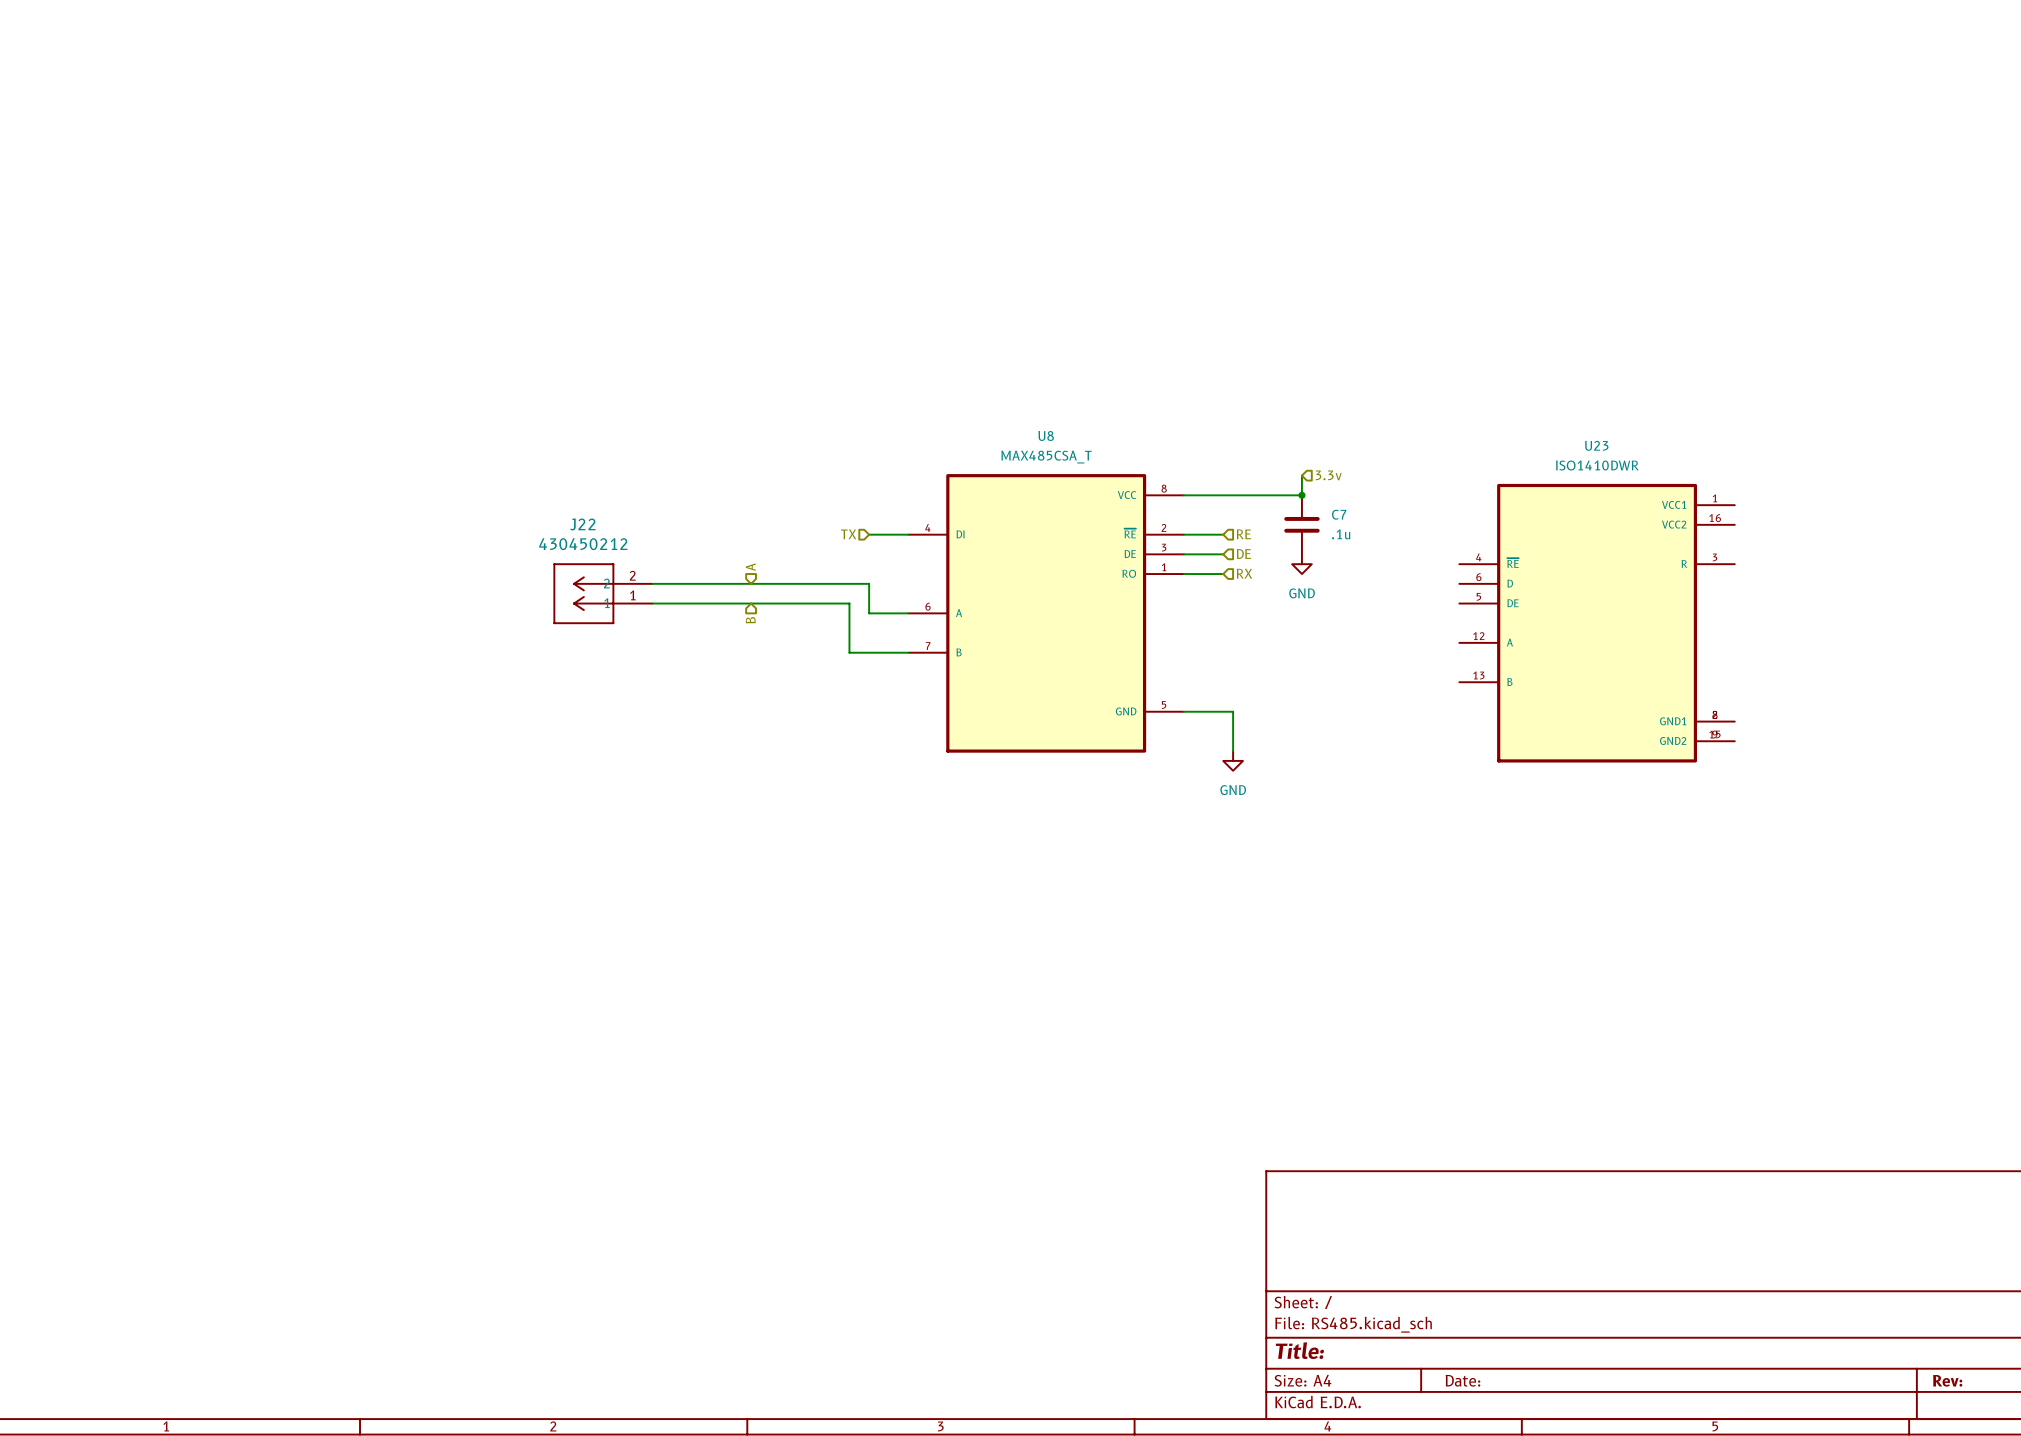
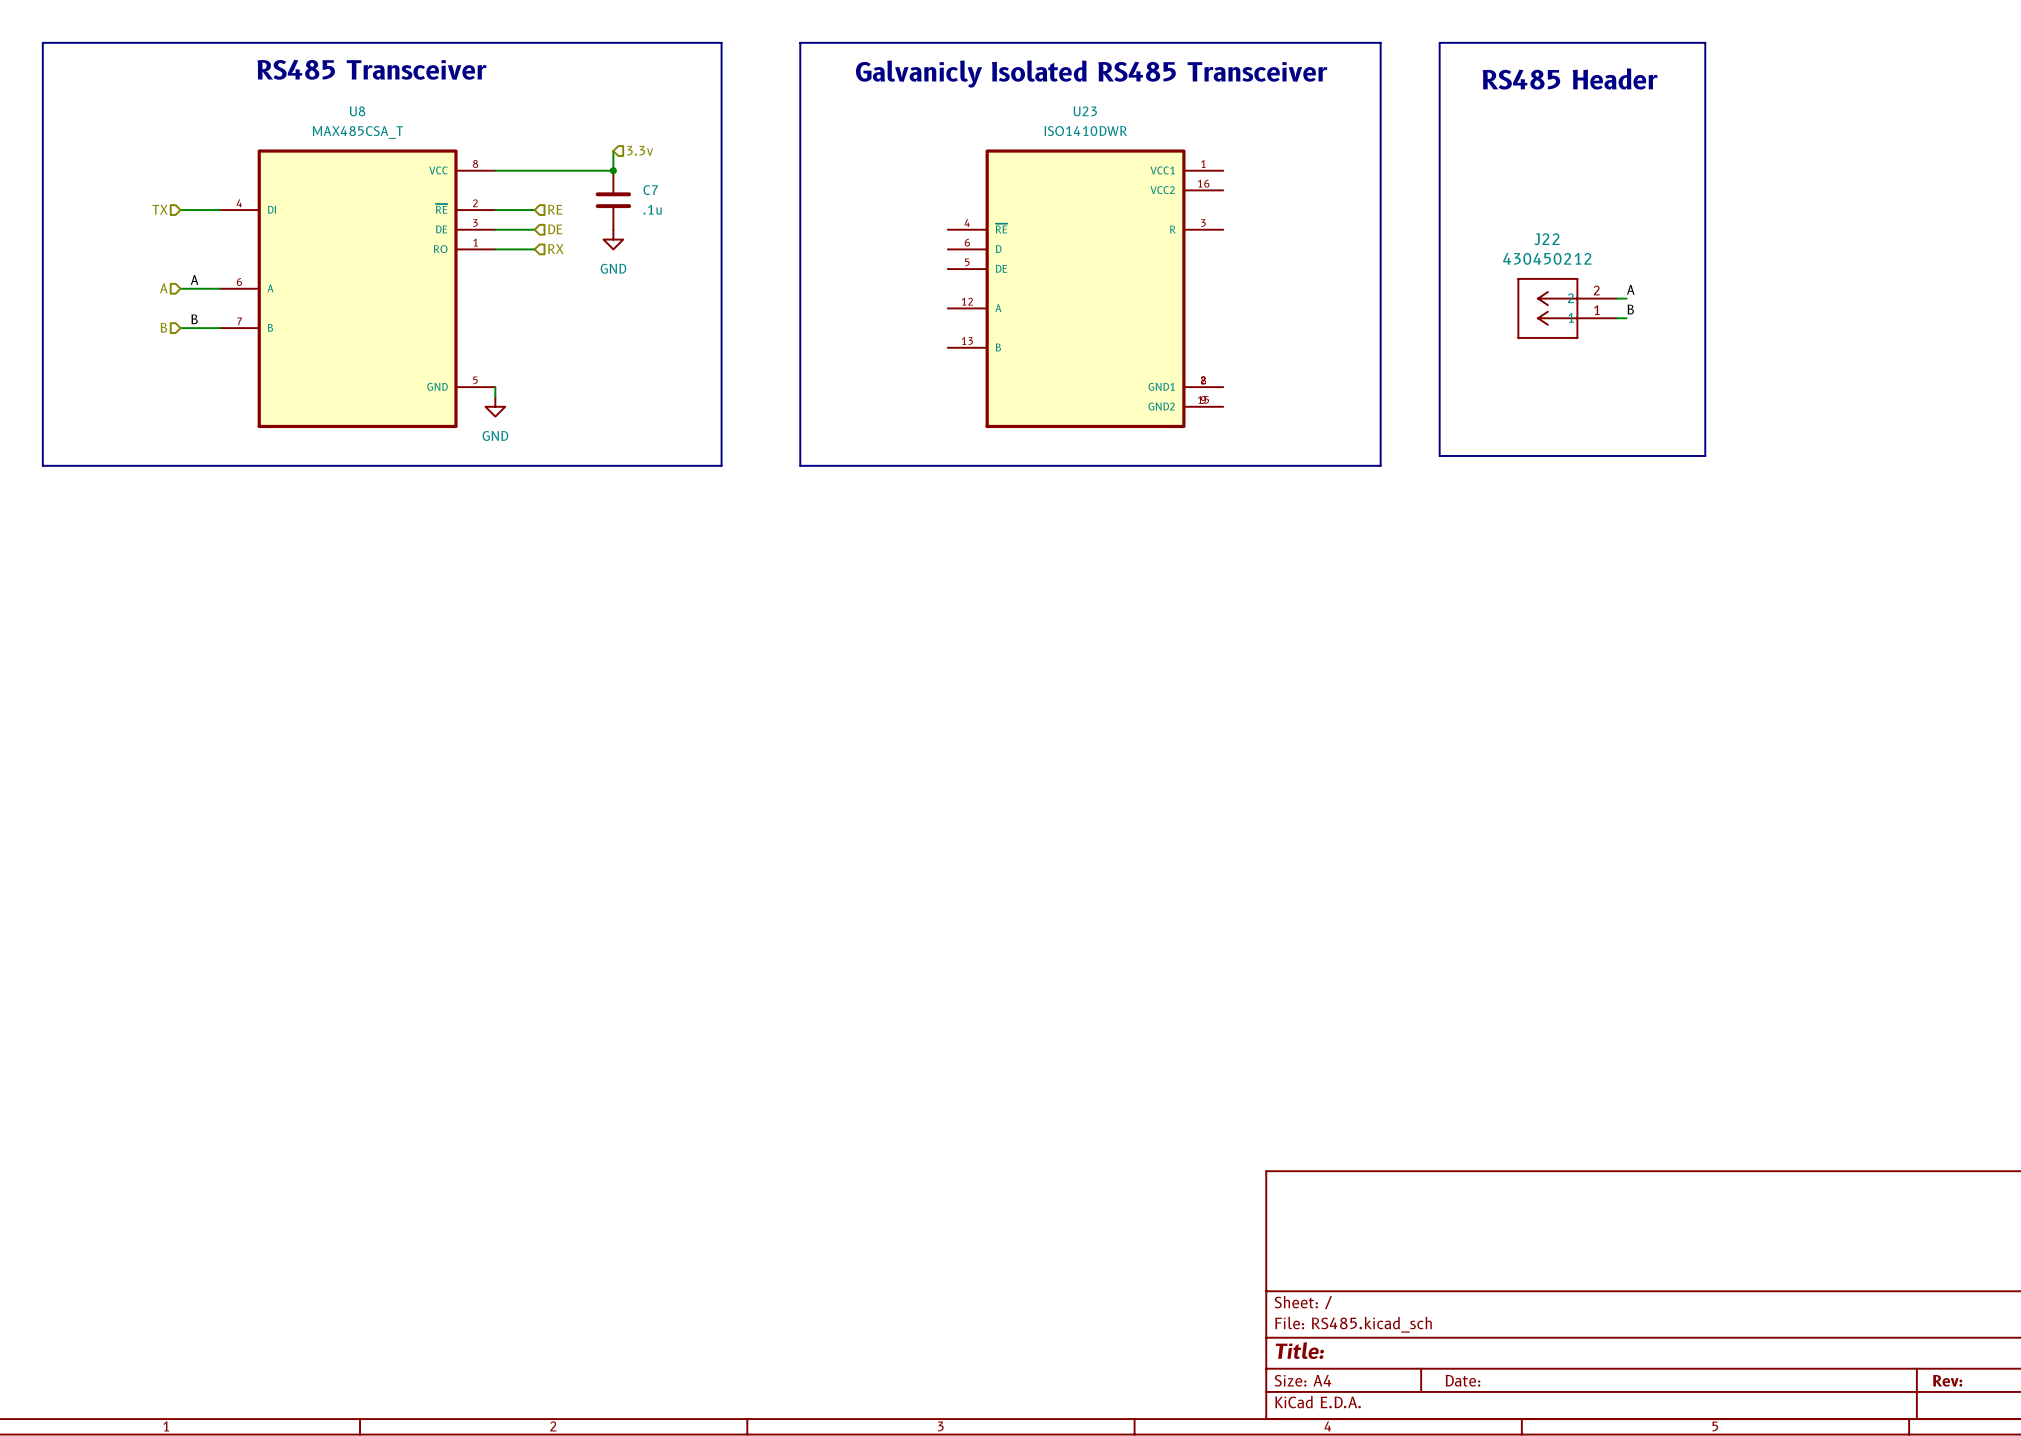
line: none -> (42, 42) (721, 42) (721, 465) (42, 465) (42, 42)
line: none -> (800, 42) (1380, 42) (1380, 465) (800, 465) (800, 42)
line: none -> (1439, 42) (1705, 42) (1705, 455) (1439, 455) (1439, 42)
text: none -> RS485 Transceiver (371, 69)
text: none -> Galvanicly Isolated RS485 Transceiver (1091, 74)
text: none -> RS485 Header (1570, 78)
hierarchical label: none -> 3.3v (640, 150)
wire: none -> (613, 151) (613, 170) (495, 170)
junction: none -> (613, 170)
hierarchical label: none -> TX (160, 209)
hierarchical label: none -> RE (555, 209)
wire: none -> (180, 210) (219, 210)
wire: none -> (495, 210) (534, 210)
wire: none -> (495, 229) (534, 229)
hierarchical label: none -> DE (555, 229)
power symbol: none -> GND (613, 239)
wire: none -> (495, 249) (534, 249)
hierarchical label: none -> RX (555, 249)
label: none -> A (194, 279)
hierarchical label: none -> A (163, 288)
wire: none -> (180, 288) (219, 288)
label: none -> A (1630, 289)
wire: none -> (1616, 298) (1626, 298)
label: none -> B (1630, 309)
wire: none -> (1616, 318) (1626, 318)
label: none -> B (194, 319)
hierarchical label: none -> B (163, 327)
wire: none -> (180, 328) (219, 328)
wire: none -> (495, 387) (495, 396)
power symbol: none -> GND (495, 406)
wire: (1301, 475) (1301, 495) (1183, 495) -> none
hierarchical label: 3.3v (1328, 475) -> none
junction: (1301, 495) -> none
C7 position: (1301, 524) -> (613, 200)
hierarchical label: TX (848, 534) -> none
wire: (869, 534) (908, 534) -> none
wire: (1183, 534) (1223, 534) -> none
hierarchical label: RE (1243, 534) -> none
wire: (1183, 554) (1223, 554) -> none
hierarchical label: DE (1243, 554) -> none
power symbol: GND (1301, 564) -> none
hierarchical label: A (750, 567) -> none
hierarchical label: RX (1244, 573) -> none
wire: (1183, 574) (1223, 574) -> none
wire: (652, 583) (869, 583) (869, 613) (908, 613) -> none
J22 position: (603, 593) -> (1567, 308)
wire: (652, 603) (849, 603) (849, 652) (908, 652) -> none
U8 position: (1046, 613) -> (357, 288)
hierarchical label: B (750, 620) -> none
U23 position: (1597, 623) -> (1085, 288)
wire: (1183, 711) (1233, 711) (1233, 751) -> none
power symbol: GND (1233, 760) -> none

